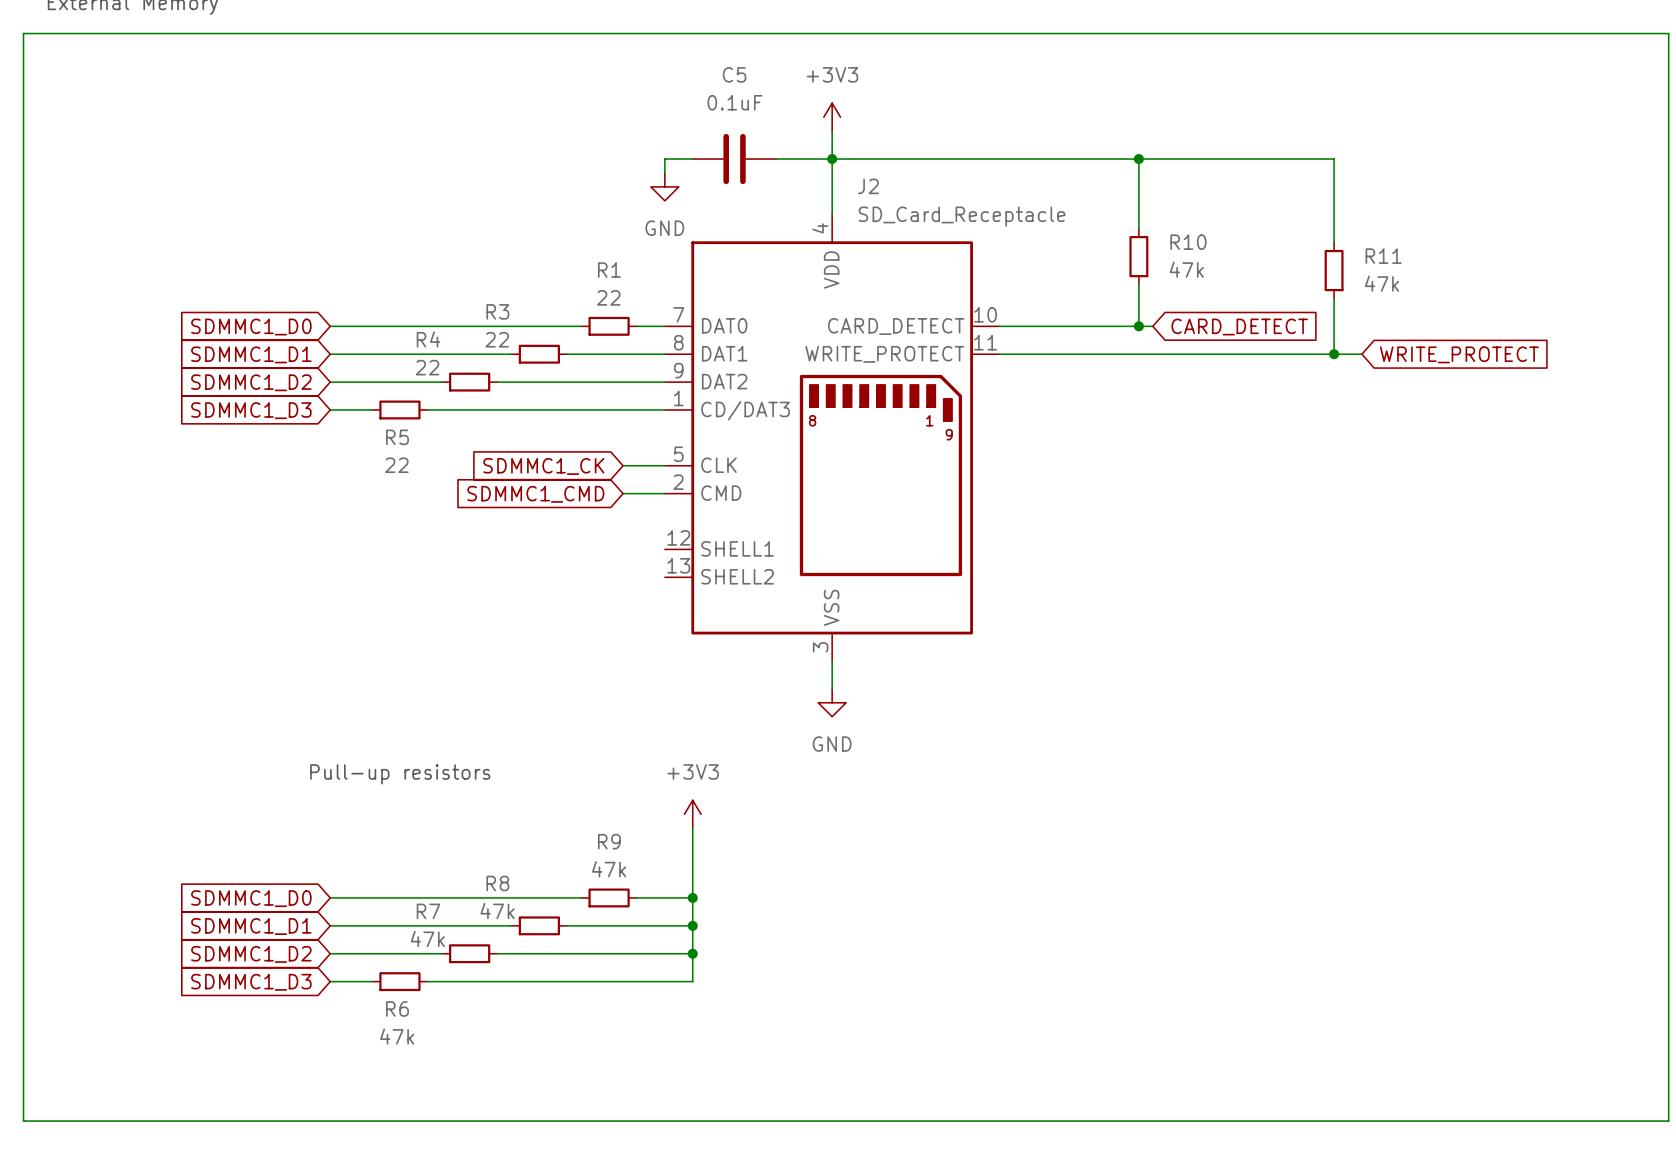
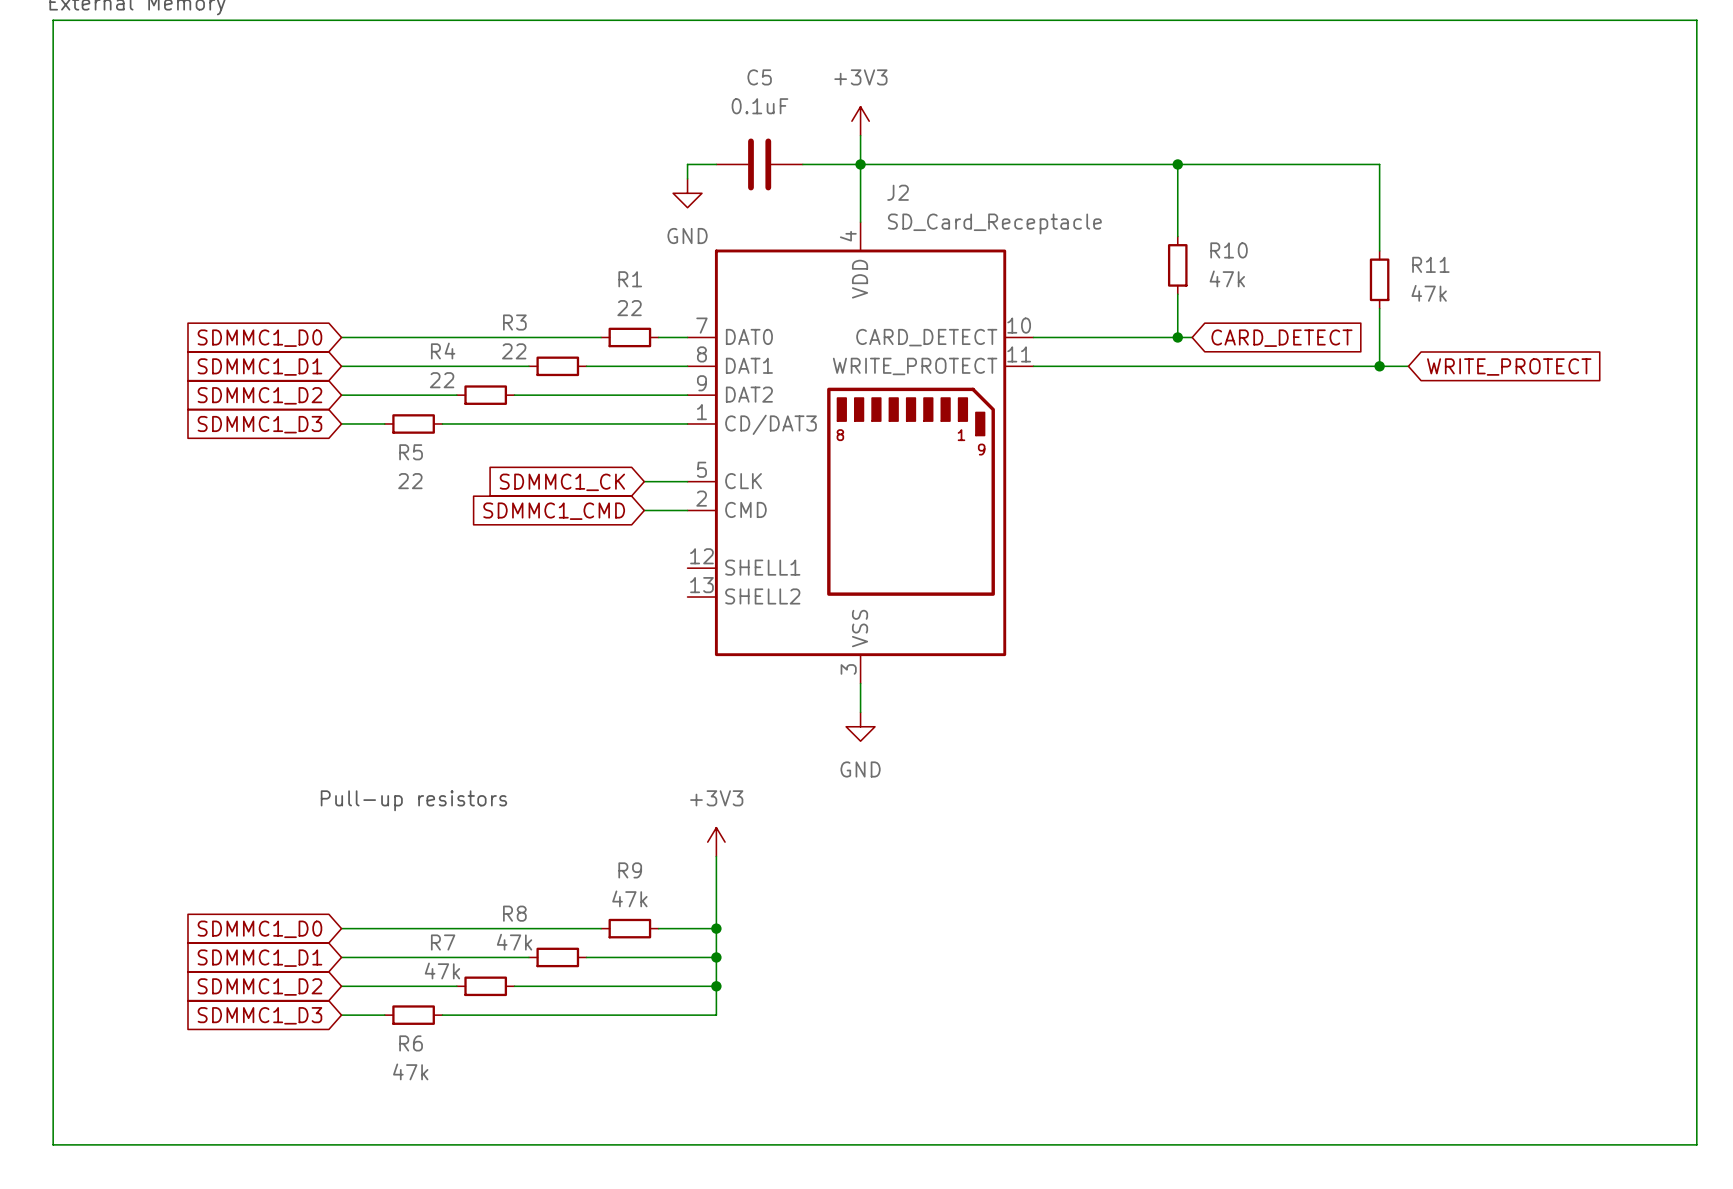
wire: (23, 33) (1668, 33) (1668, 1121) (23, 1121) (23, 33) -> (53, 20) (53, 1144) (1696, 1144) (1696, 20) (53, 20)

